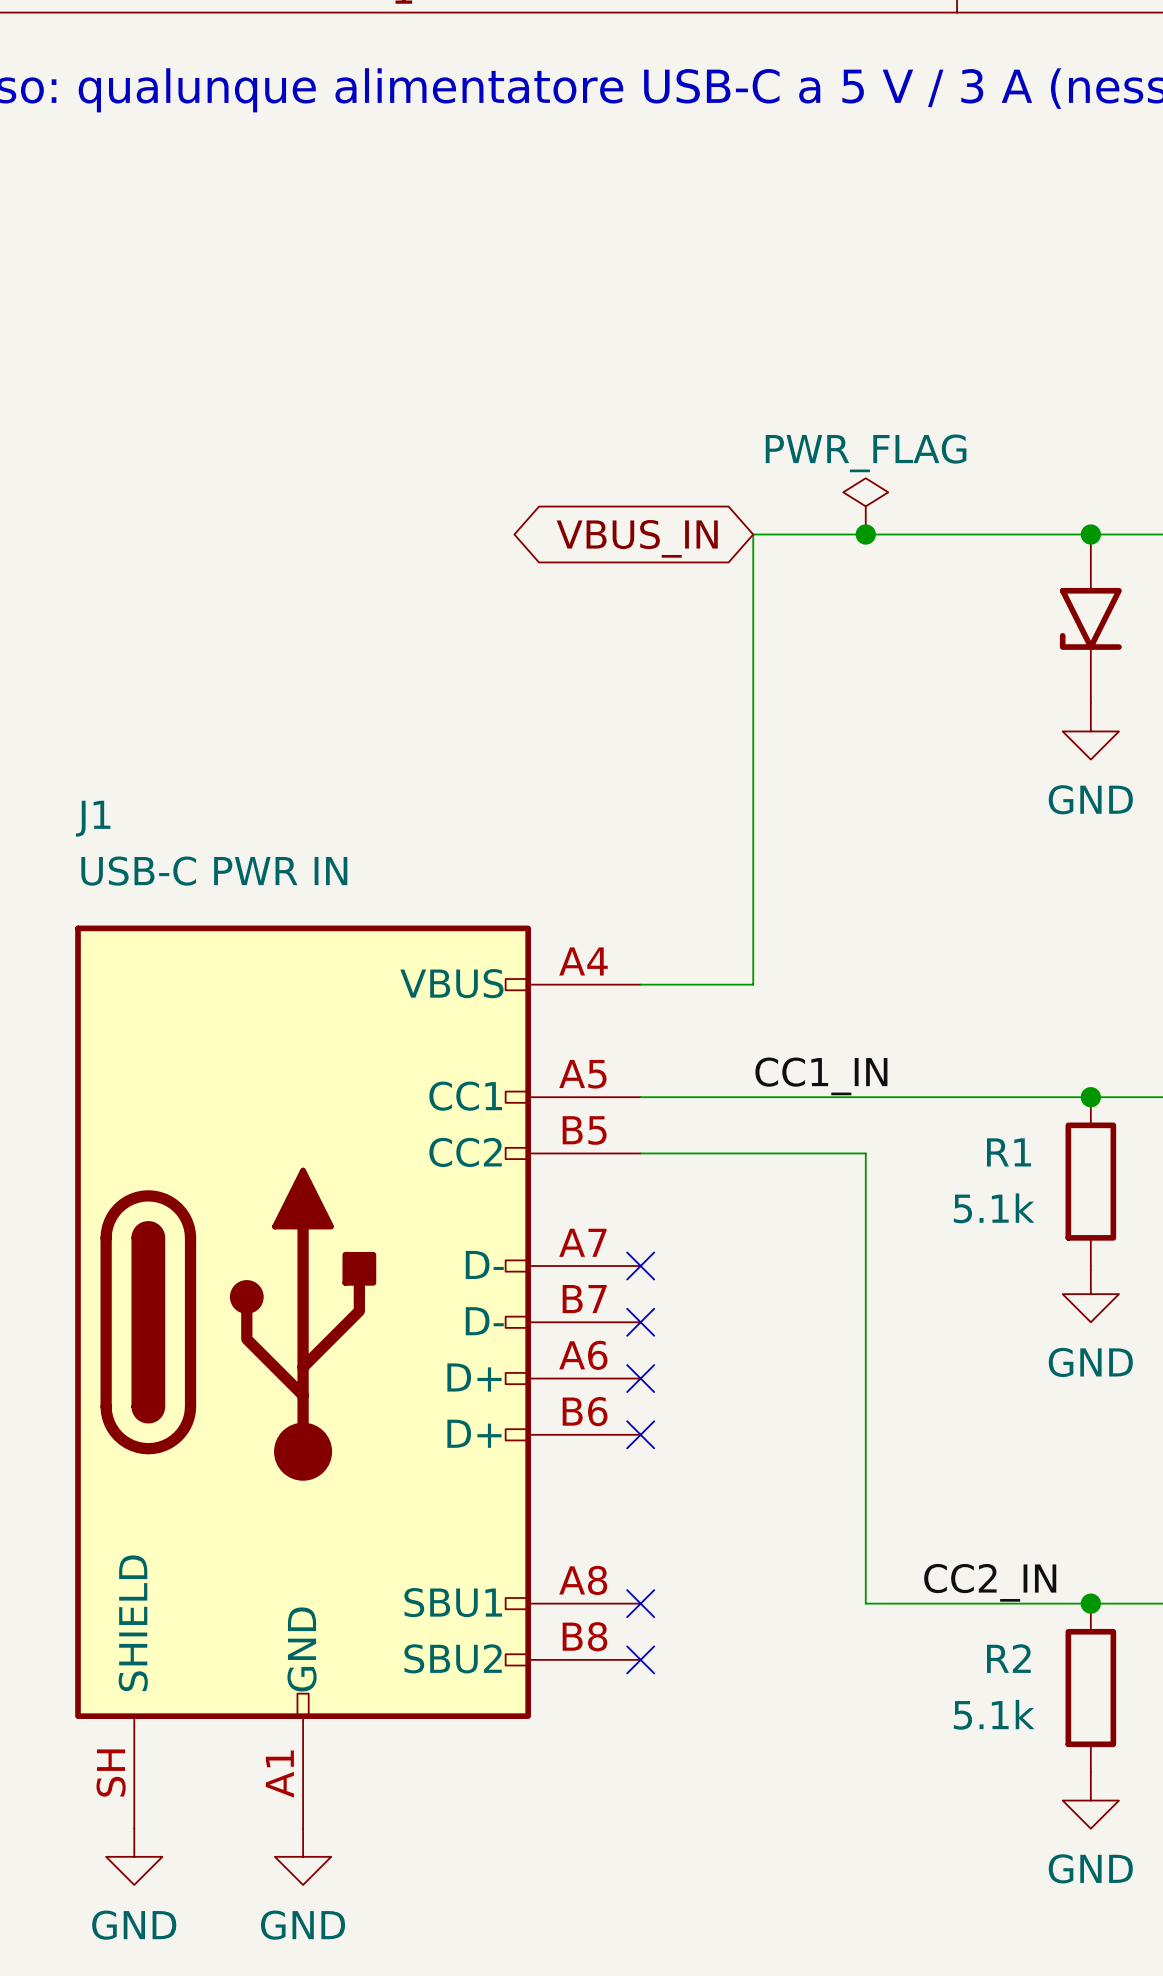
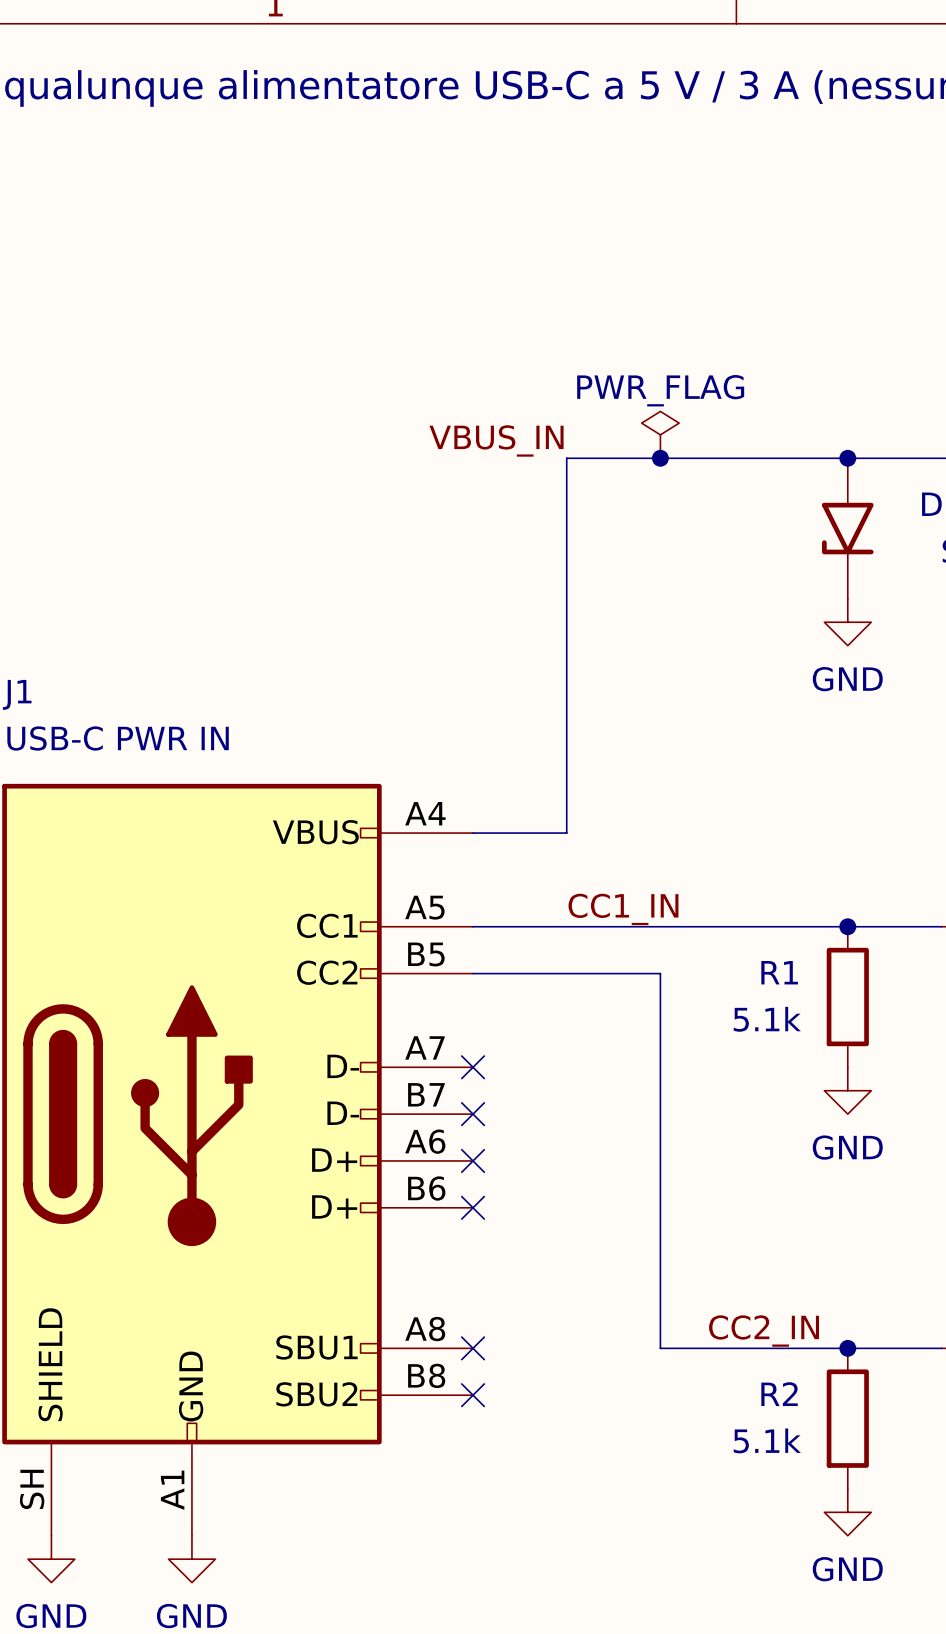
label: none -> VBUS_IN (496, 440)
global label: VBUS_IN (637, 538) -> none

